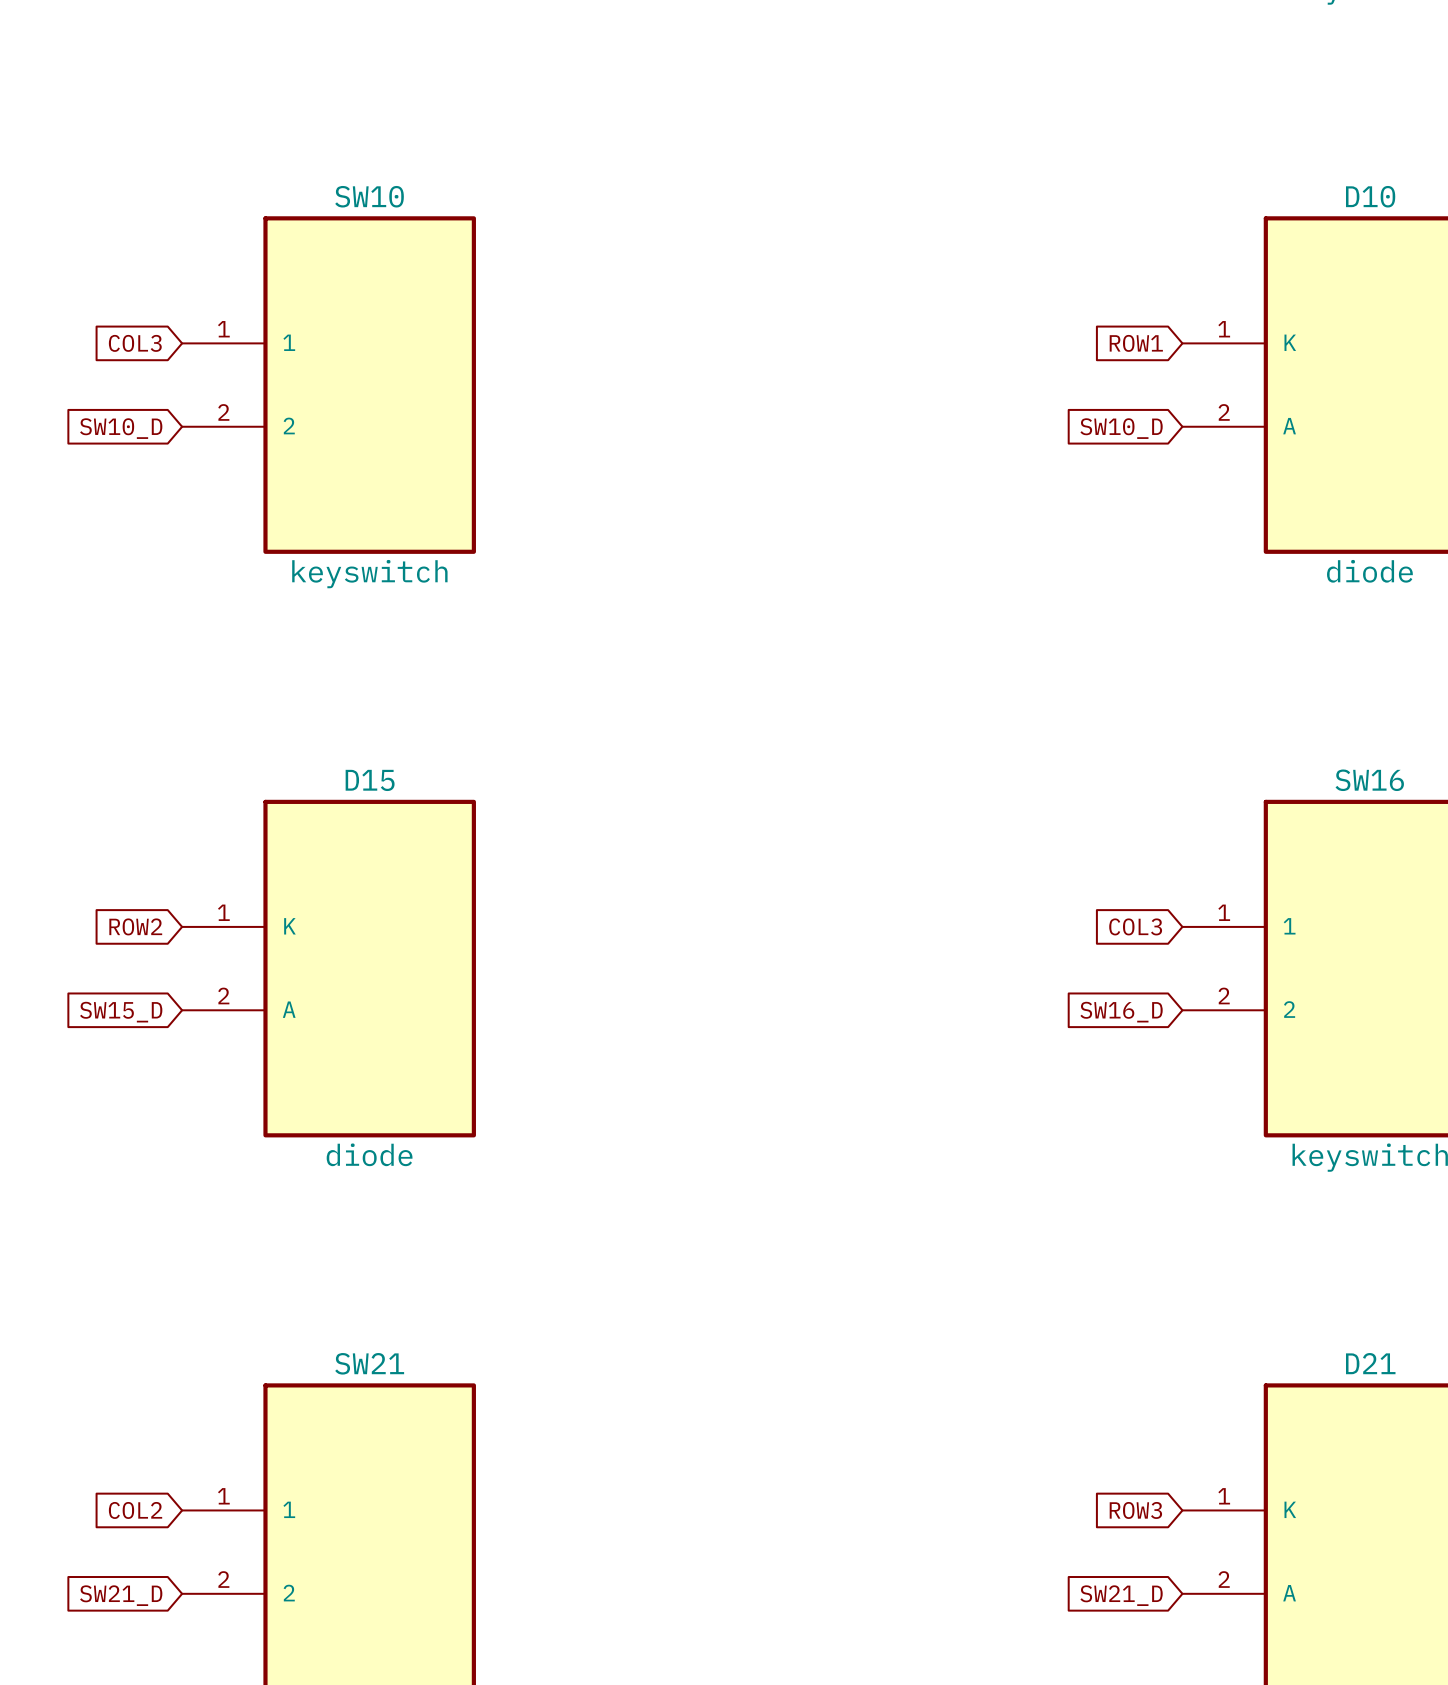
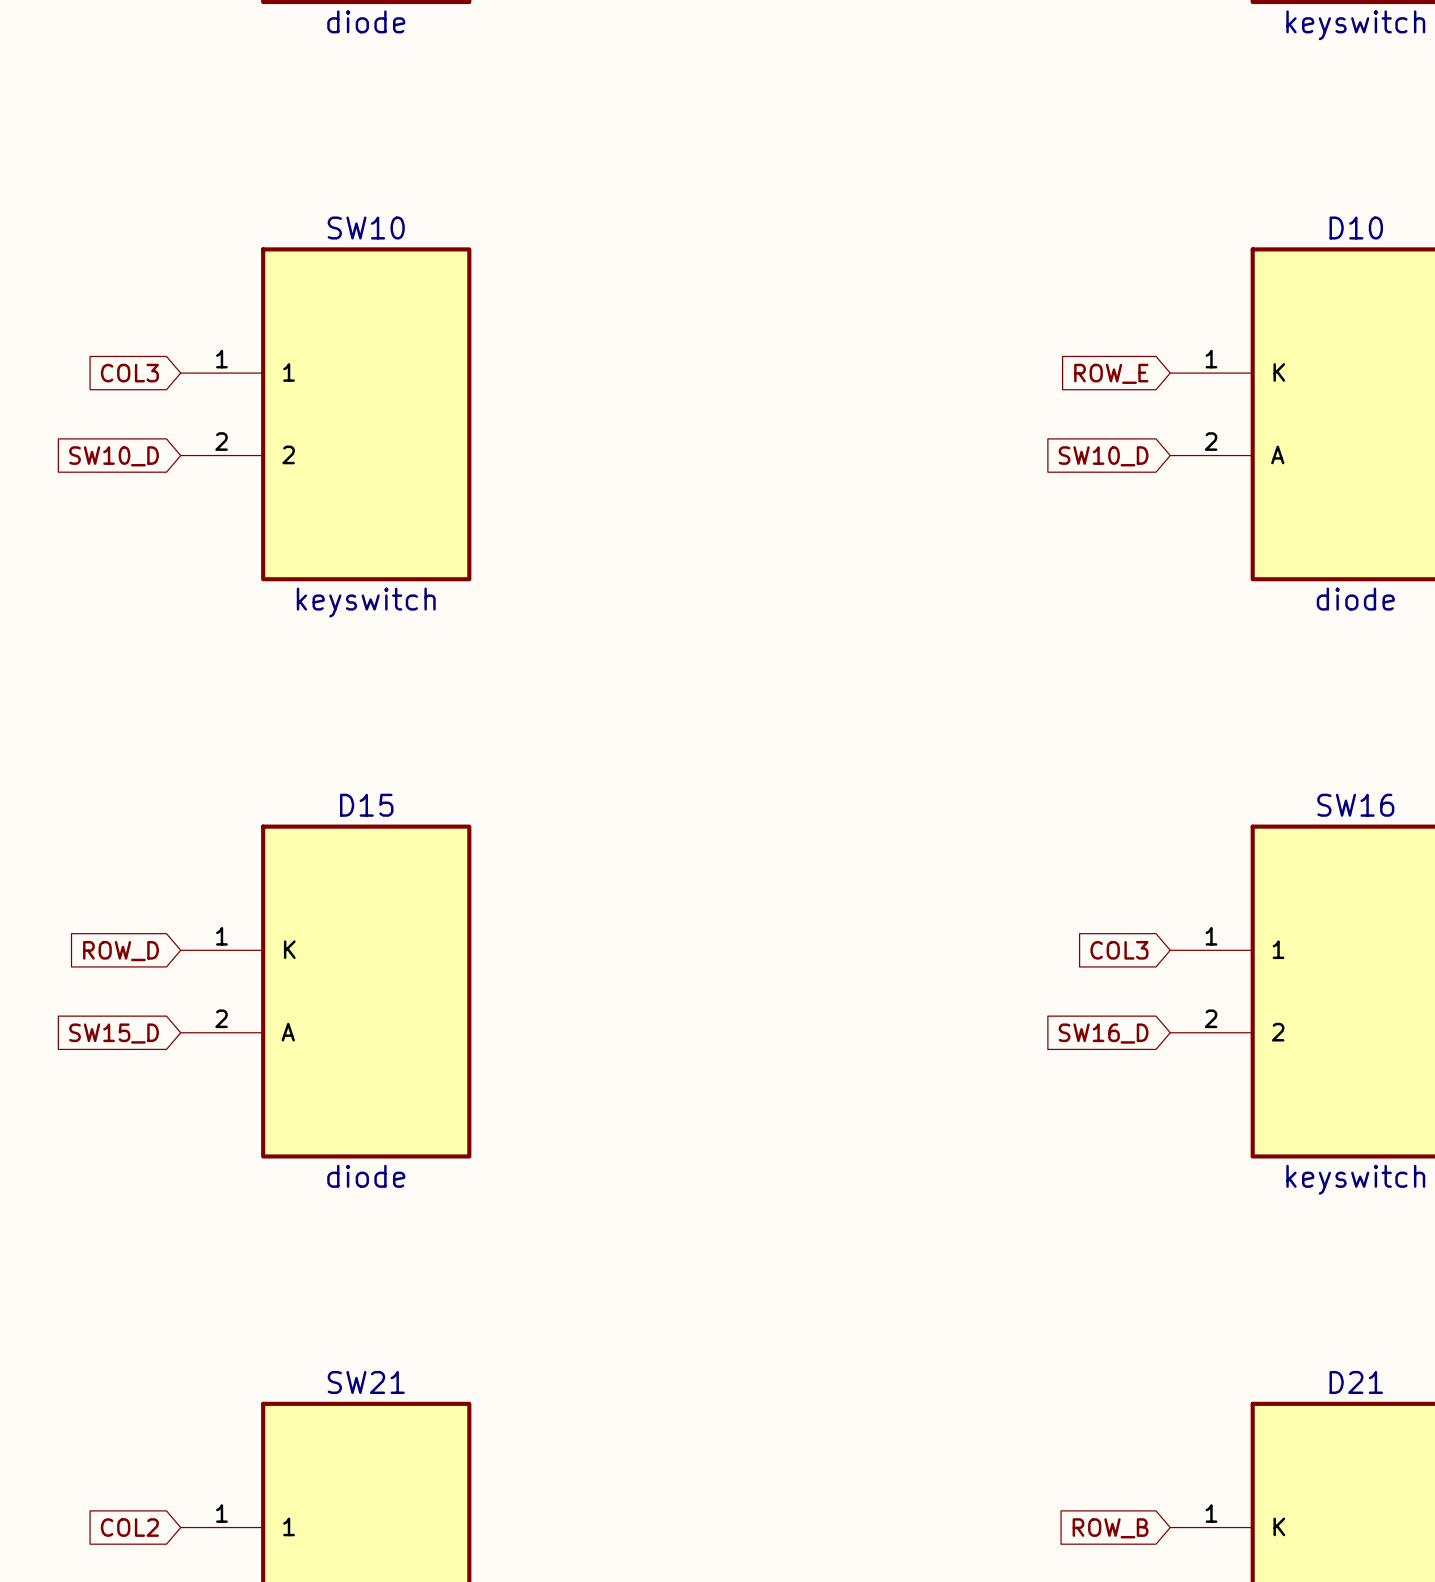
global label: ROW1 (1136, 343) -> ROW_E (1111, 373)
global label: ROW2 (135, 926) -> ROW_D (121, 951)
global label: ROW3 (1135, 1510) -> ROW_B (1110, 1528)

